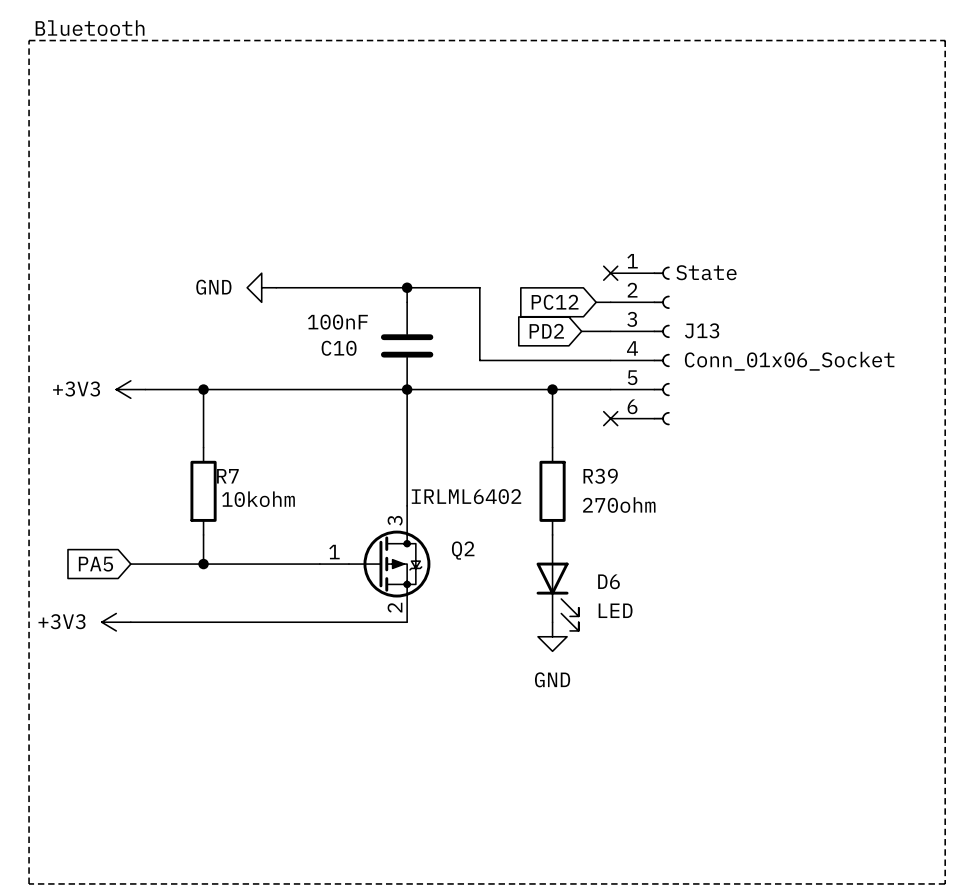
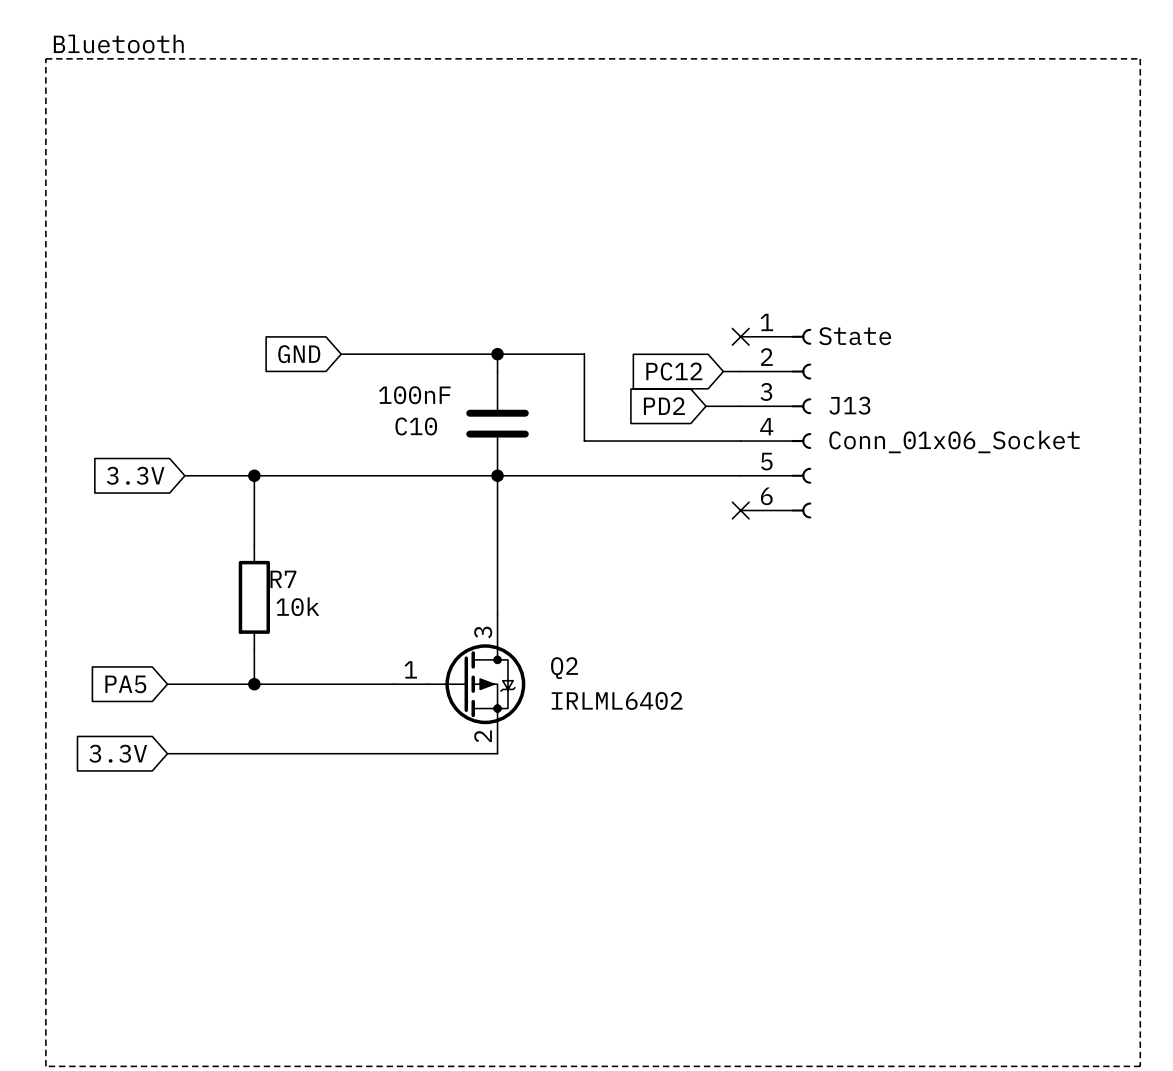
global label: none -> GND (299, 354)
power symbol: GND (261, 287) -> none
global label: none -> 3.3V (135, 475)
power symbol: +3V3 (130, 389) -> none
wire: (552, 389) (552, 447) -> none
junction: (552, 389) -> none
R39: 270ohm (552, 491) -> none
Q2 value position: IRLML6402 (466, 496) -> IRLML6402 (617, 700)
R7 value: 10kohm (258, 499) -> 10k (297, 606)
D6: LED (557, 582) -> none
global label: none -> 3.3V (118, 753)
power symbol: +3V3 (116, 622) -> none
power symbol: GND (552, 636) -> none

